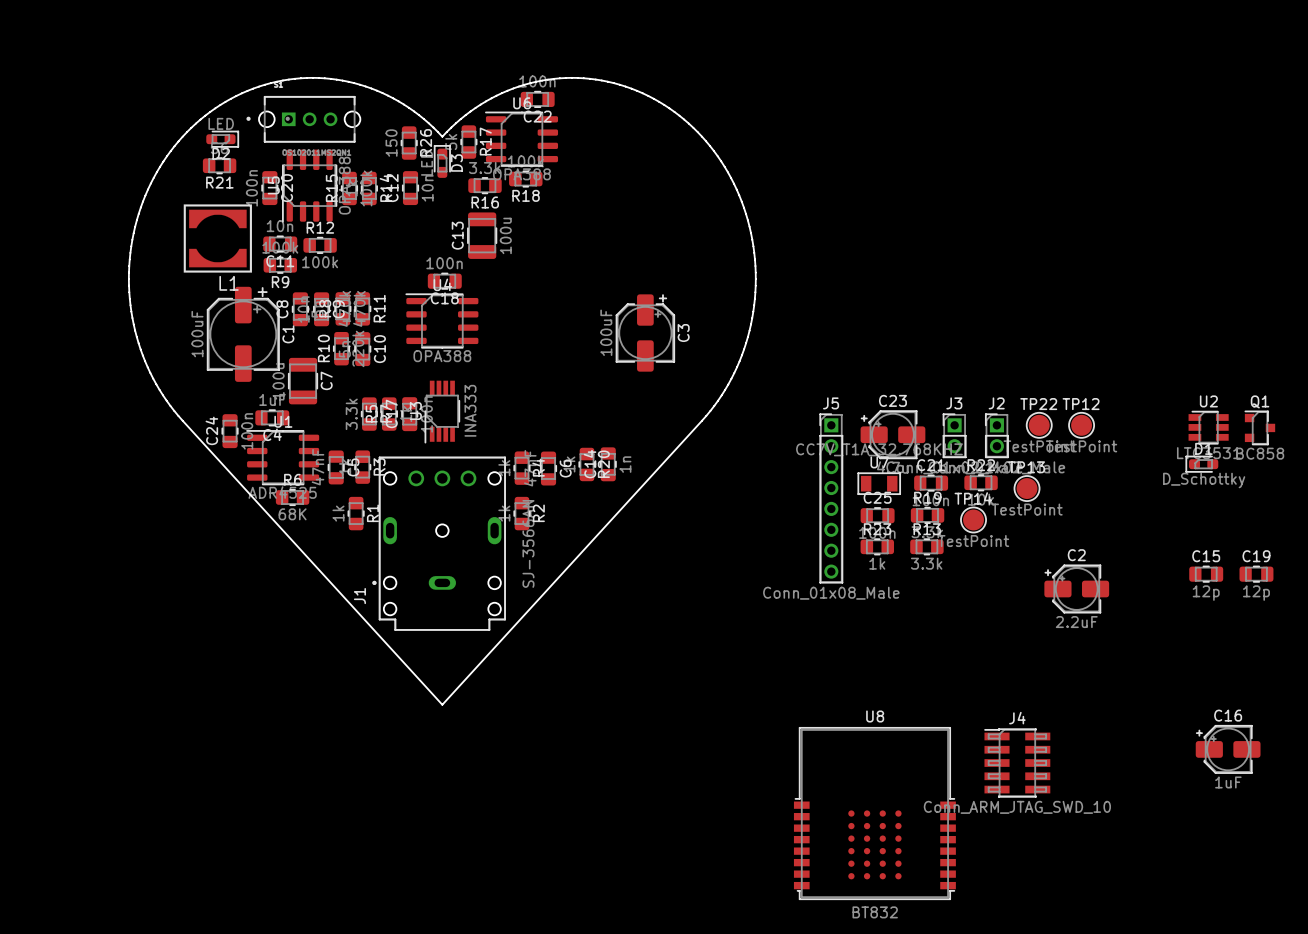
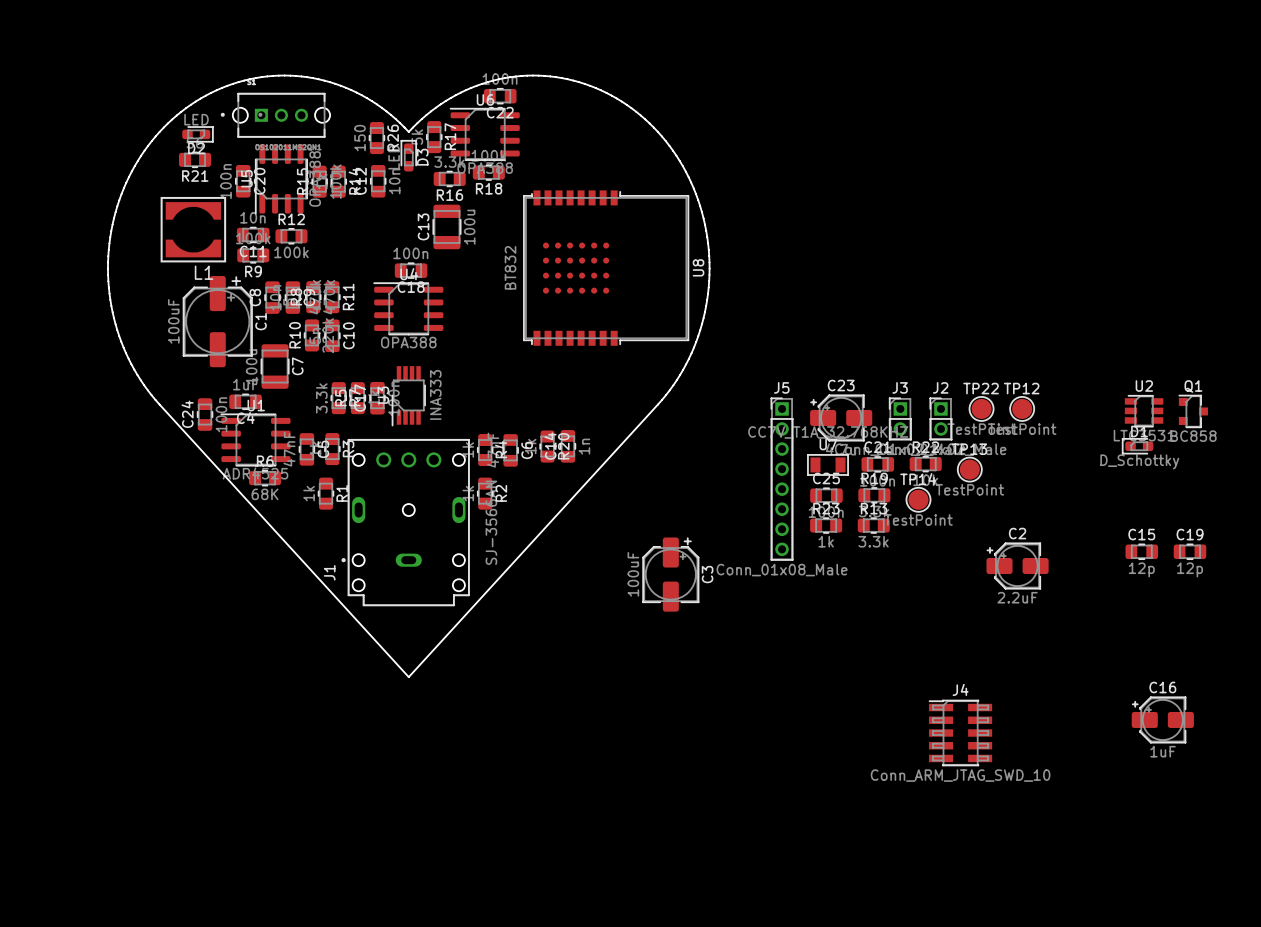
C3 position: (645, 333) -> (670, 574)
U8 rotation: 0° (874, 813) -> 90° clockwise (606, 268)
U8 position: (874, 813) -> (606, 268)

